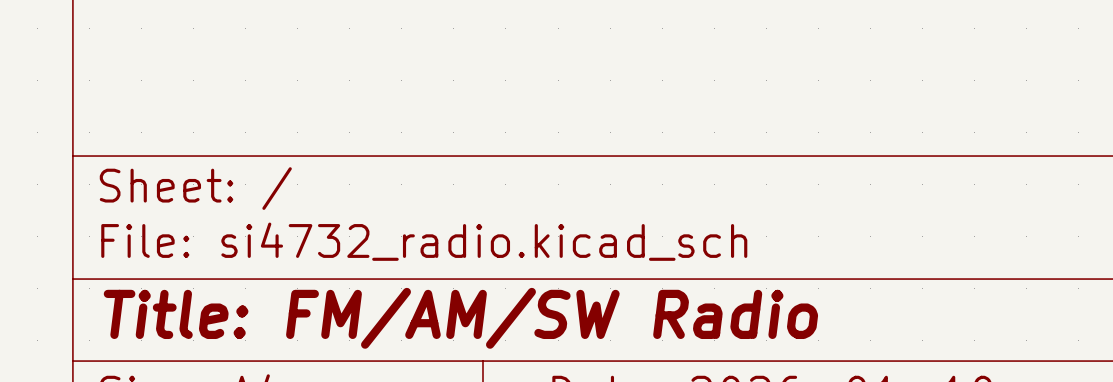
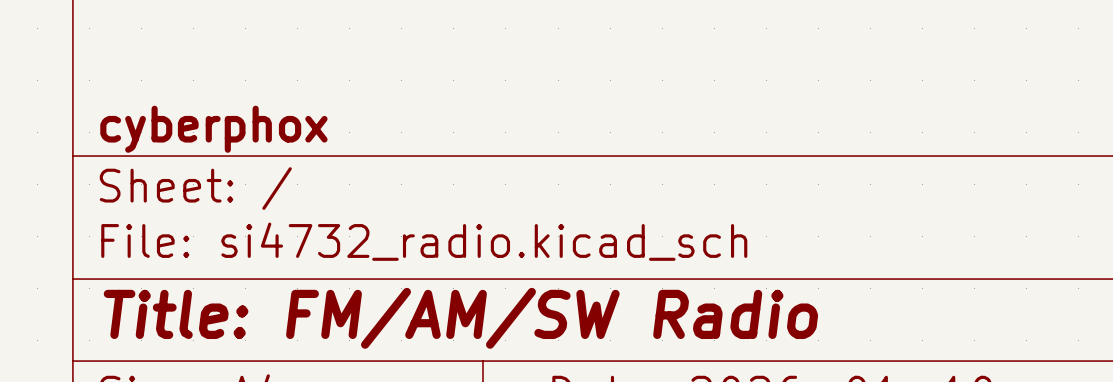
title block: none -> cyberphox (213, 129)

